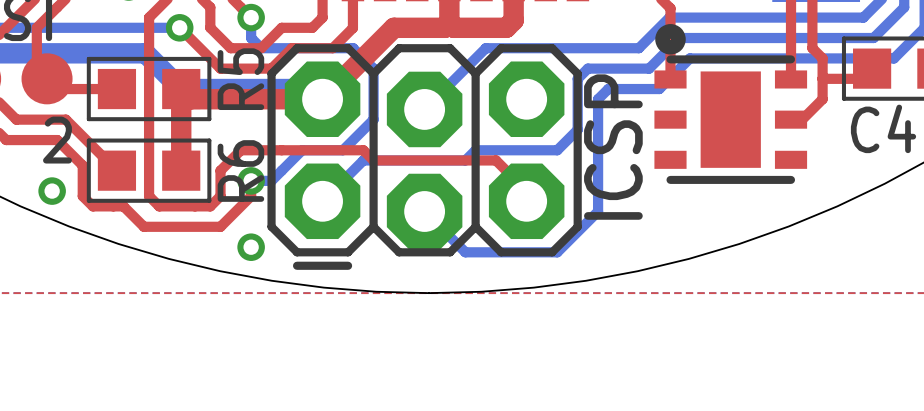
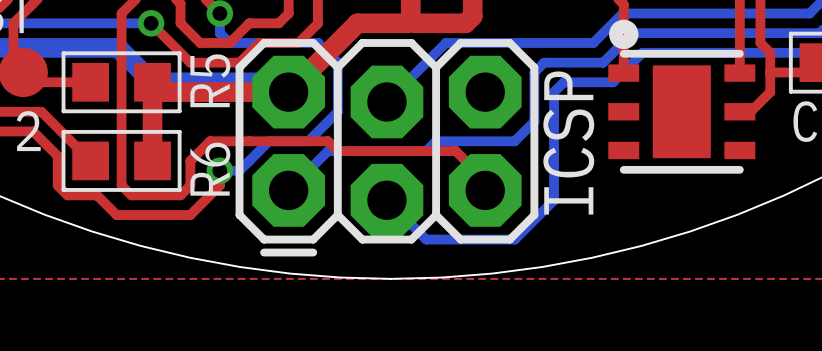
via: (52, 191) -> none
via: (251, 247) -> none

